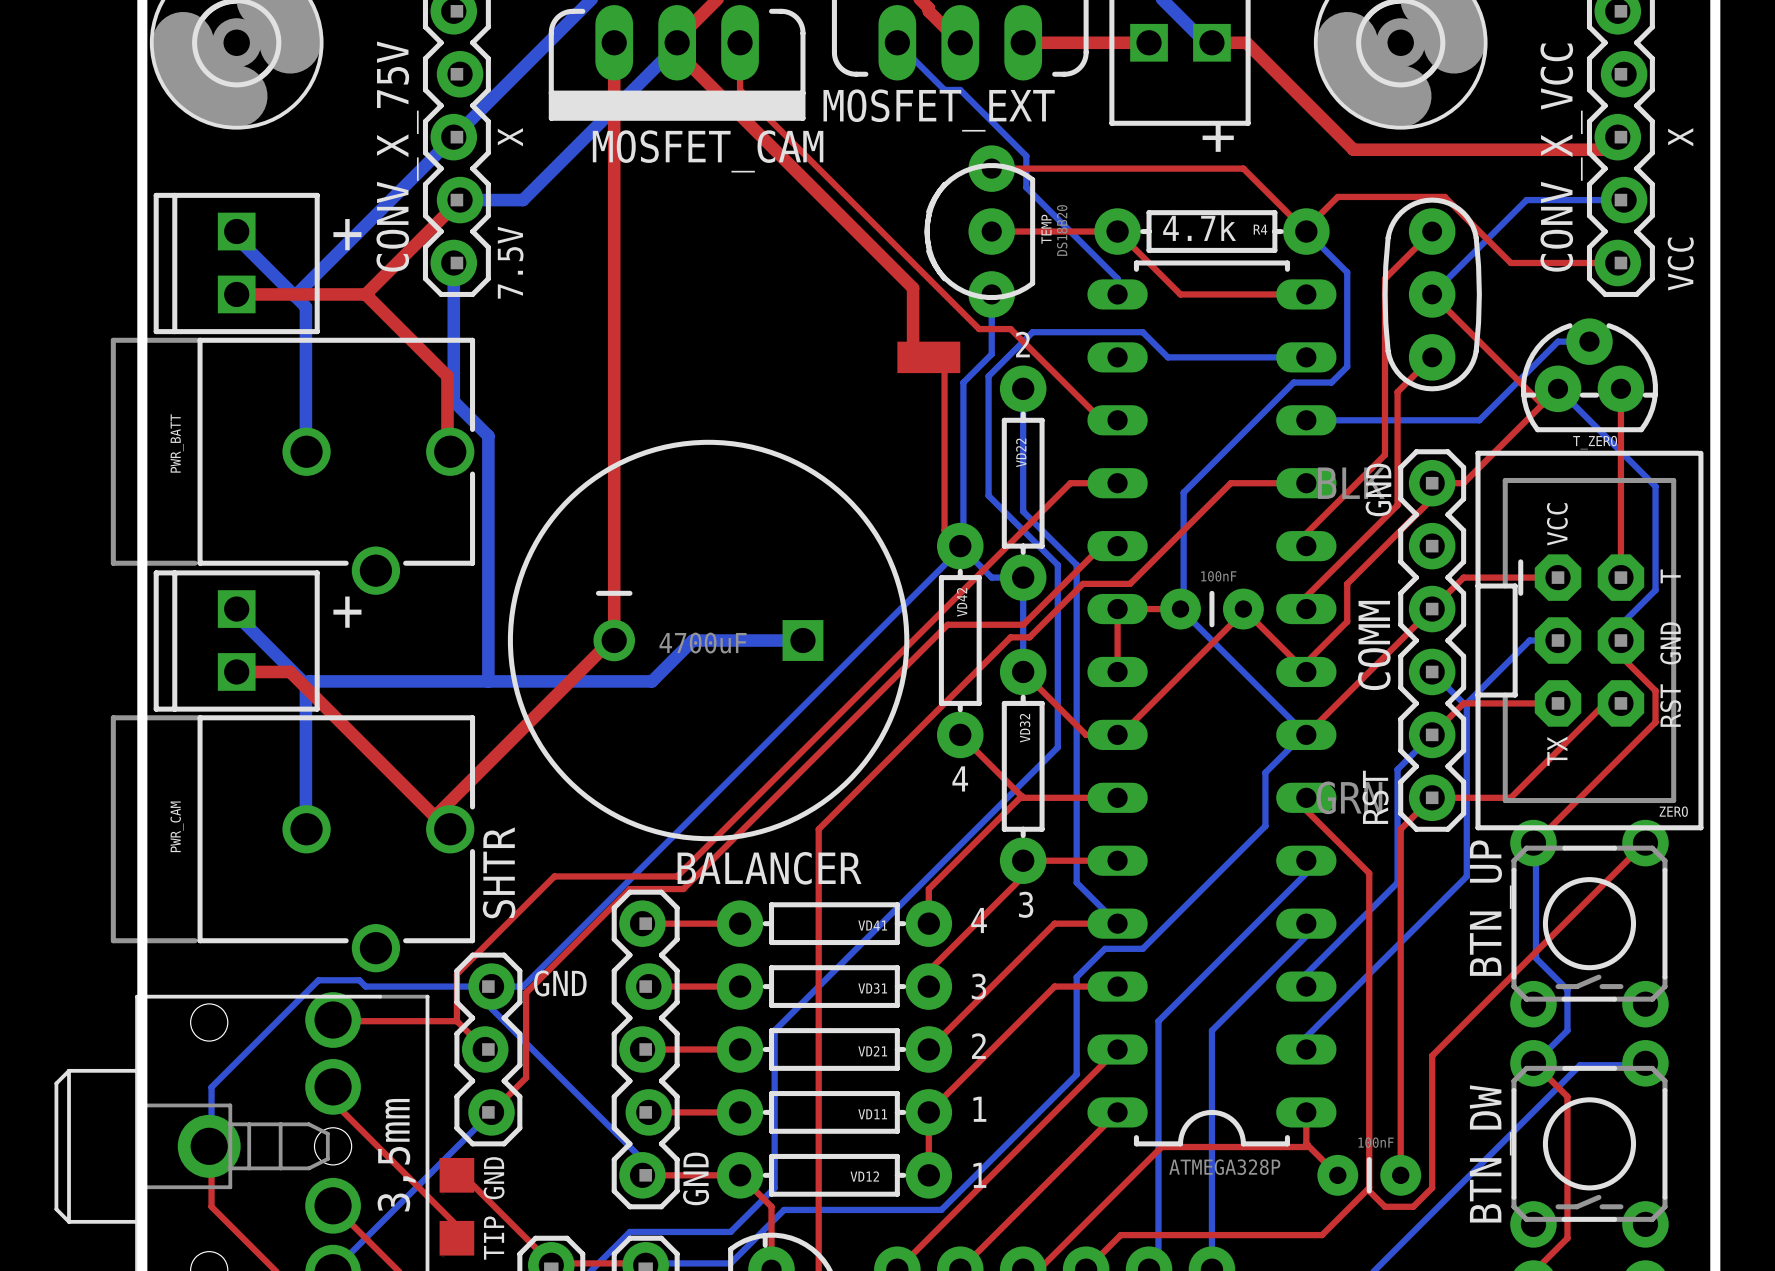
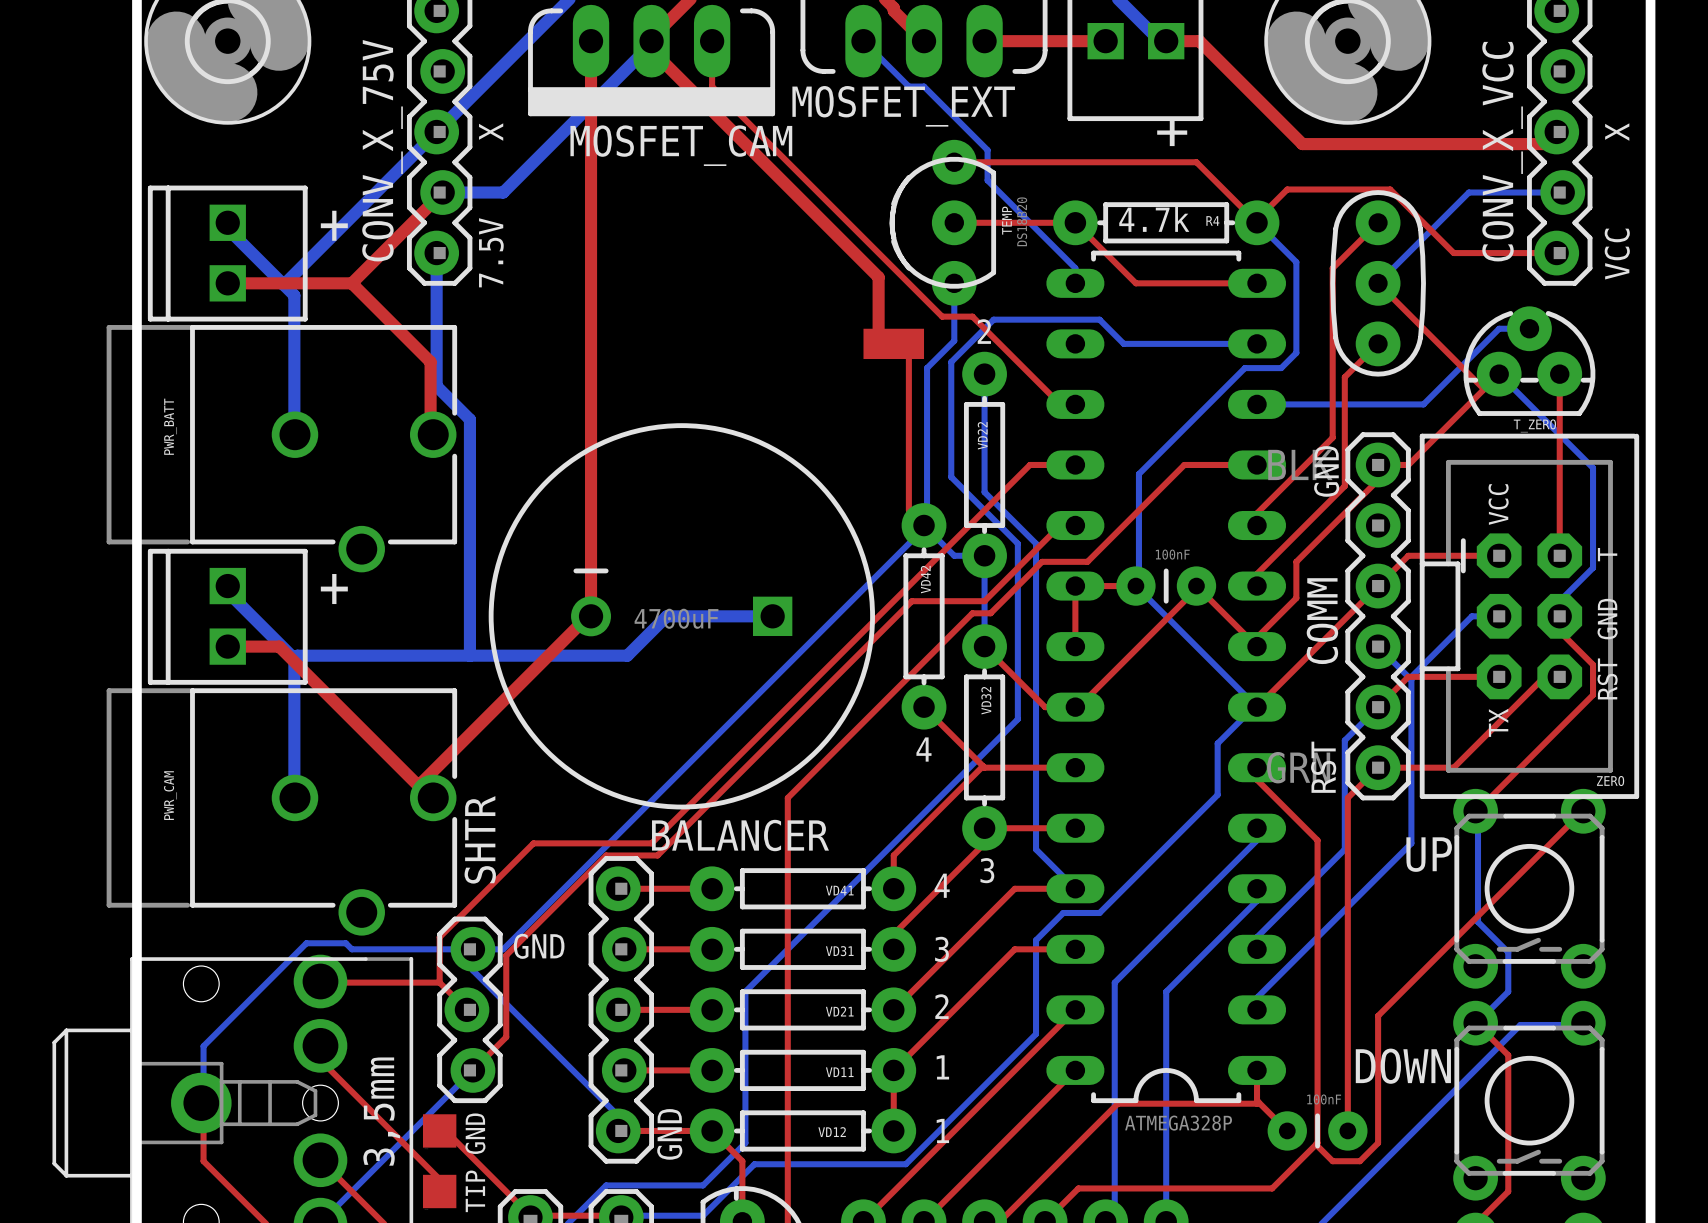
text: none -> UP (1429, 854)
BTN_UP name: BTN_UP (1490, 908) -> none
text: none -> DOWN (1403, 1066)
BTN_DW name: BTN_DW (1490, 1153) -> none

